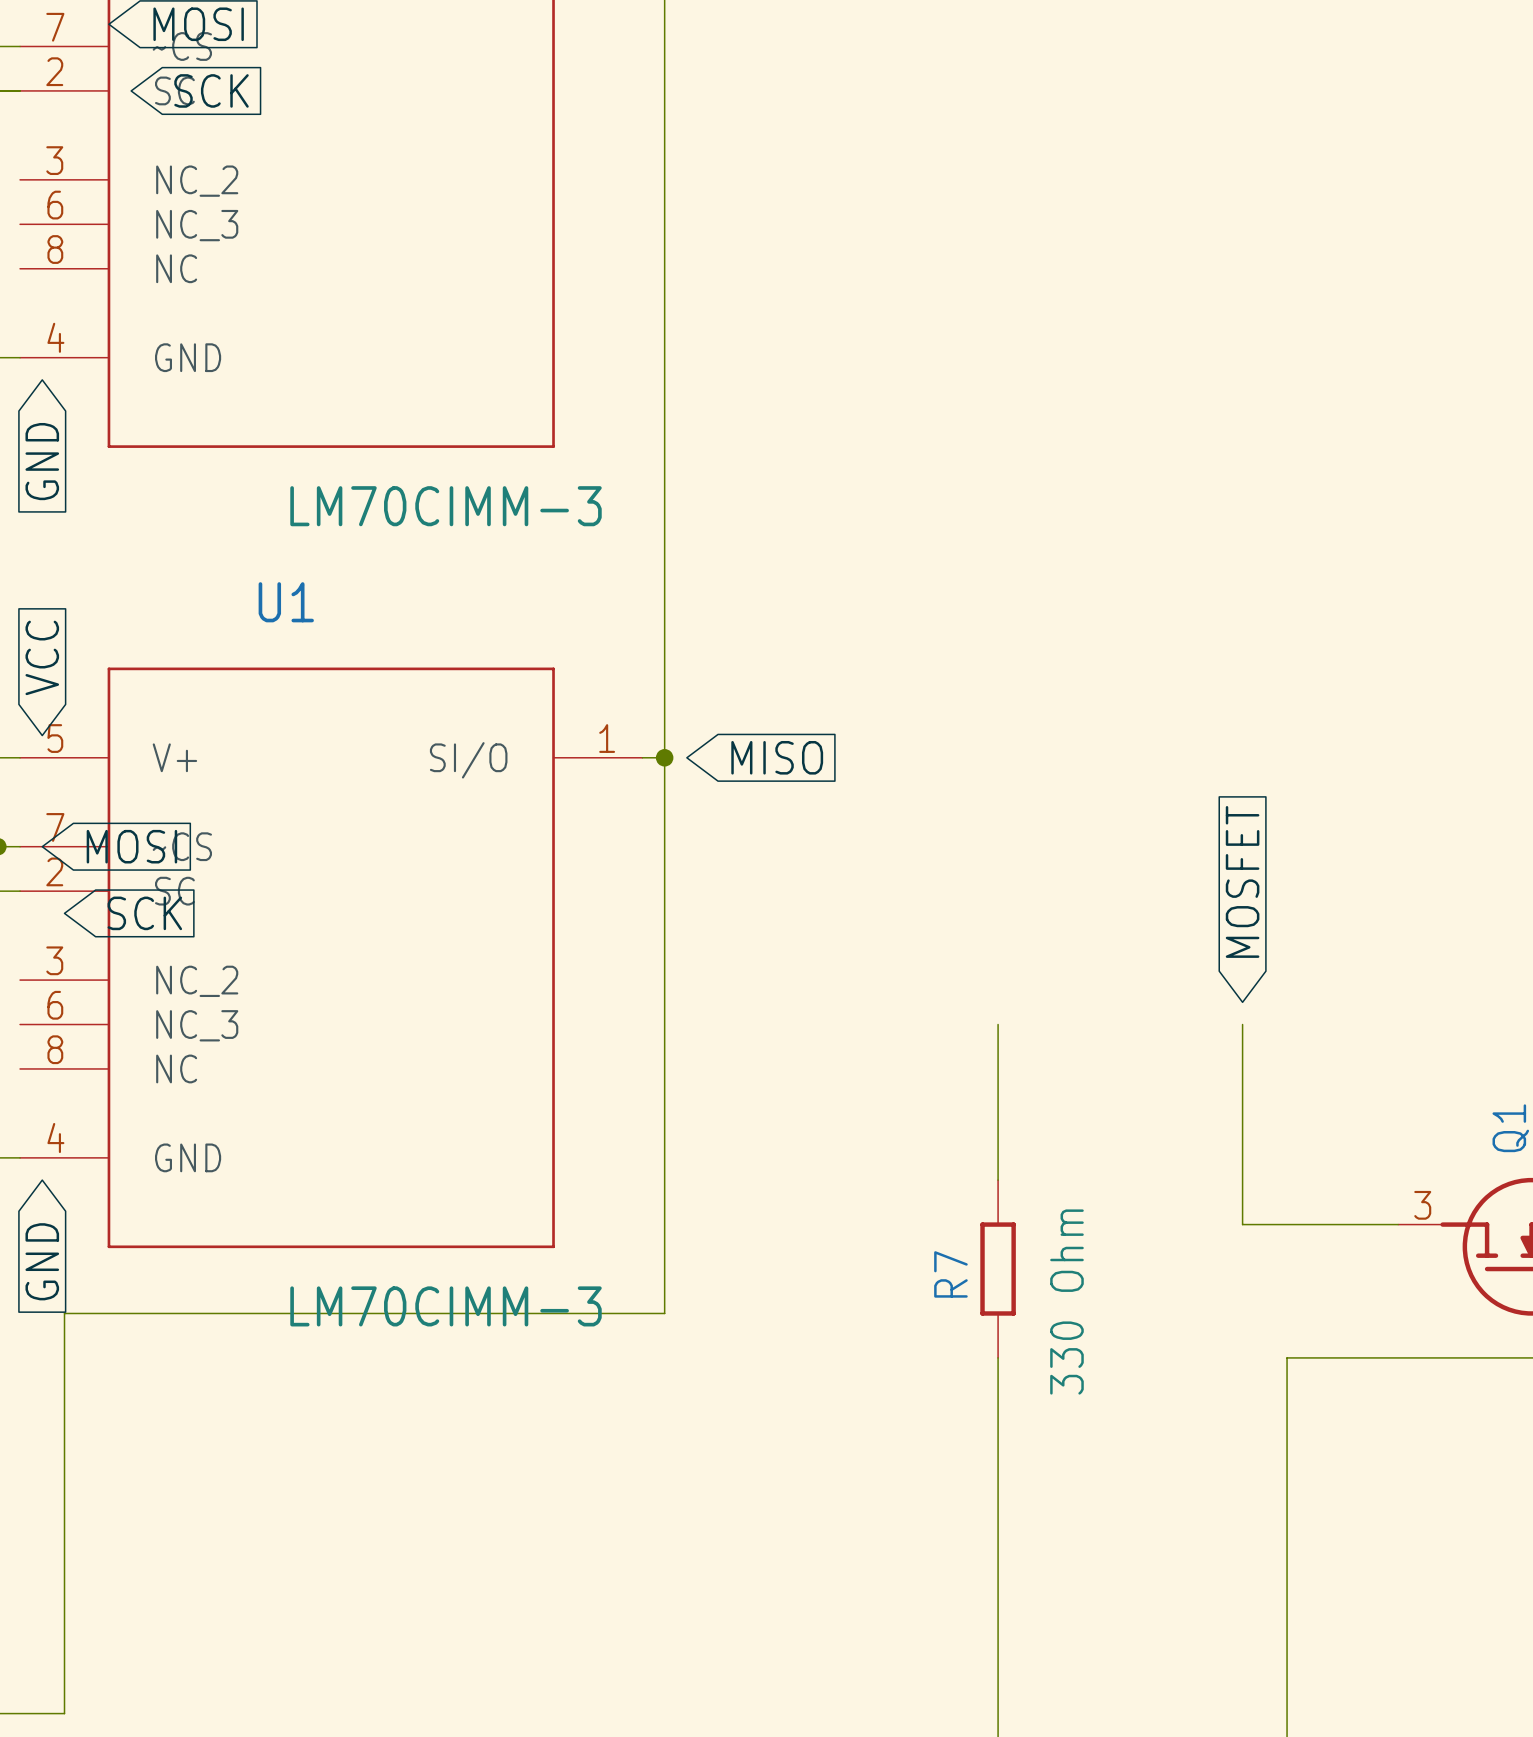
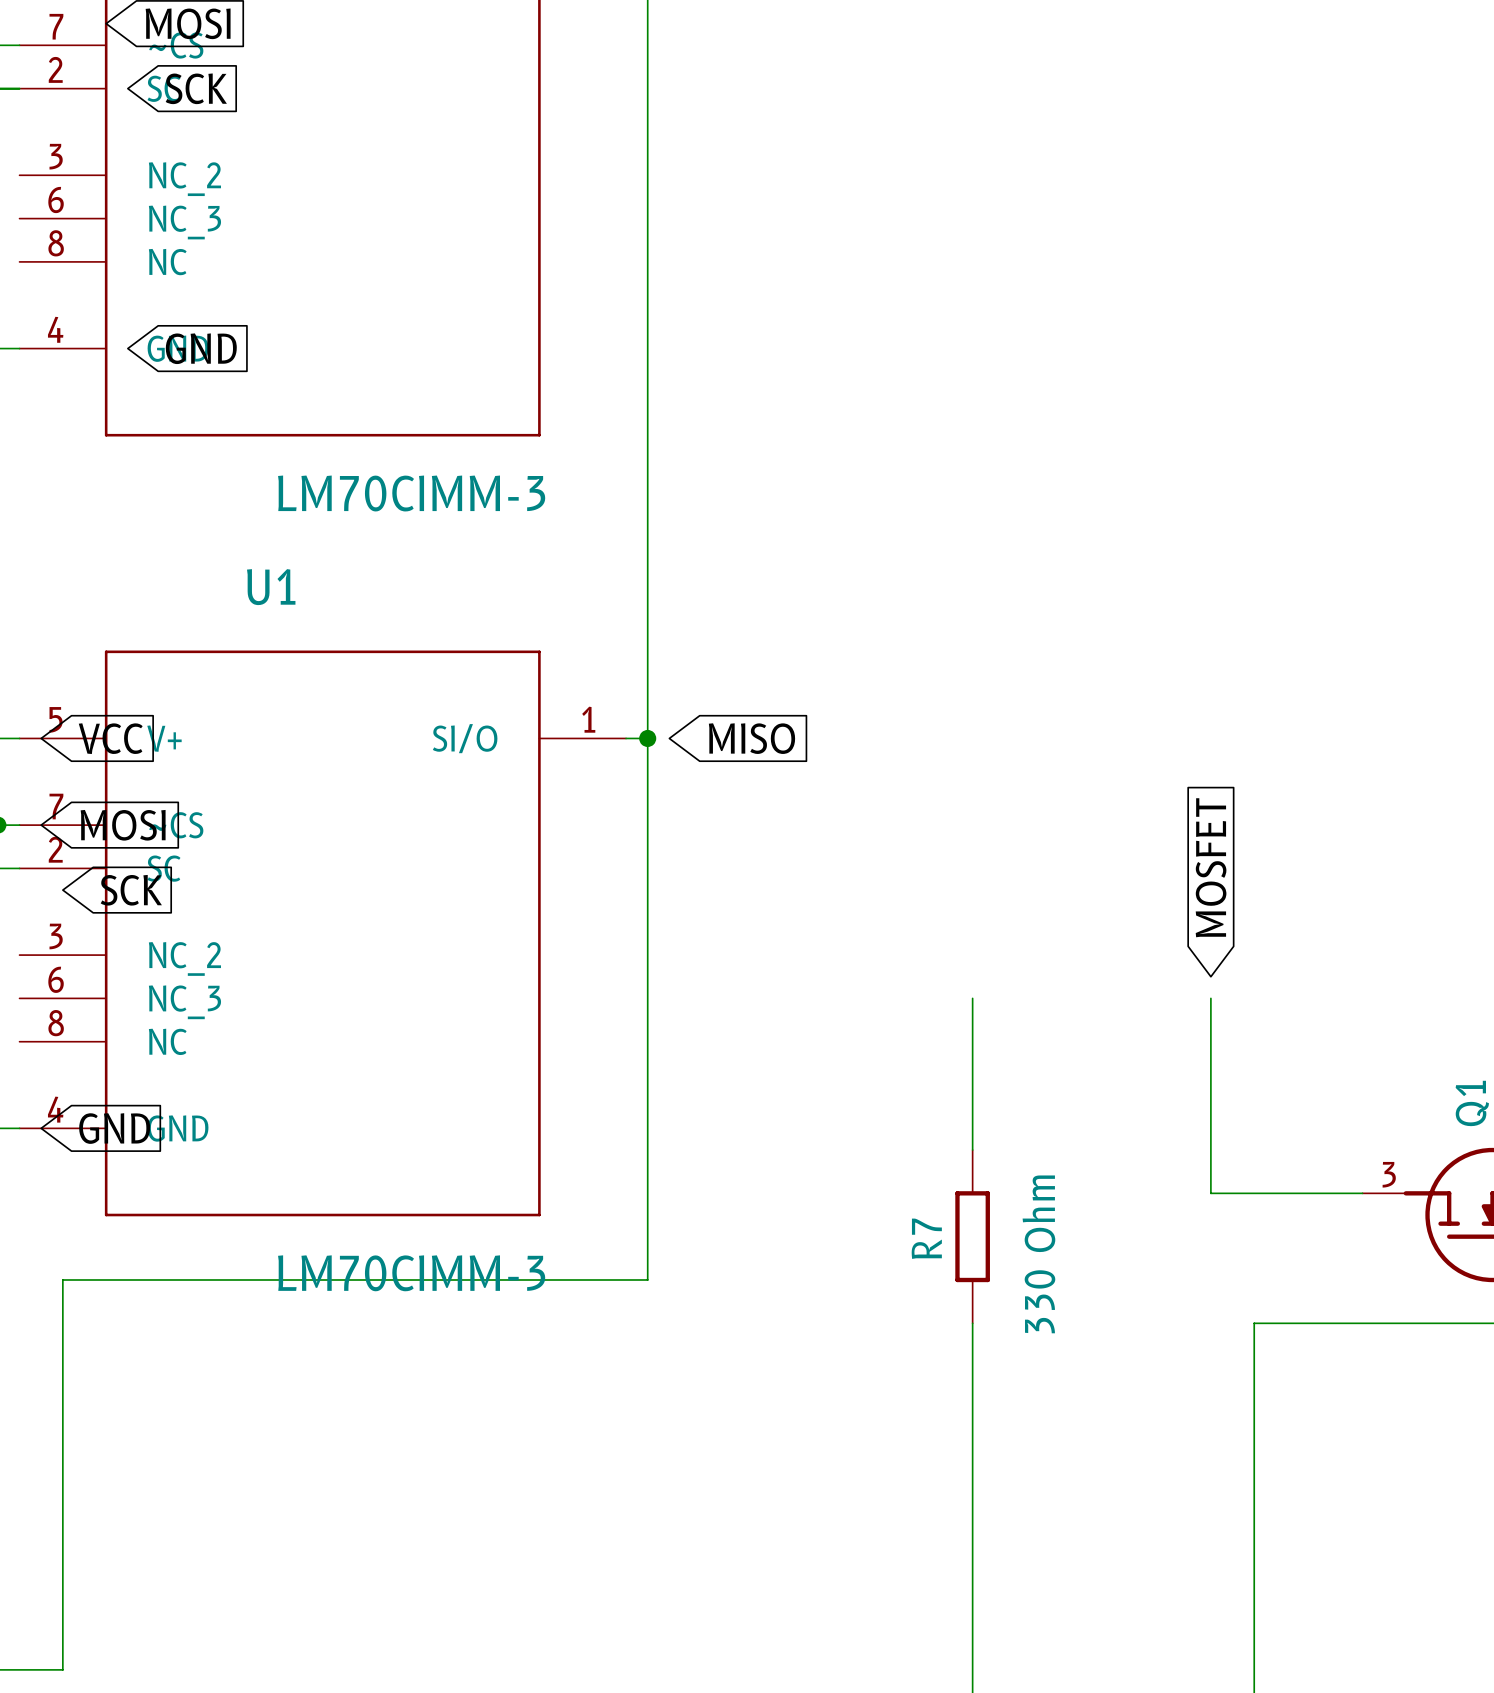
global label rotation: 0° (42, 461) -> 90° counterclockwise (201, 348)
global label position: GND (42, 461) -> GND (201, 348)
global label rotation: 0° (42, 657) -> 90° clockwise (110, 738)
global label rotation: 0° (42, 1261) -> 90° counterclockwise (114, 1128)

